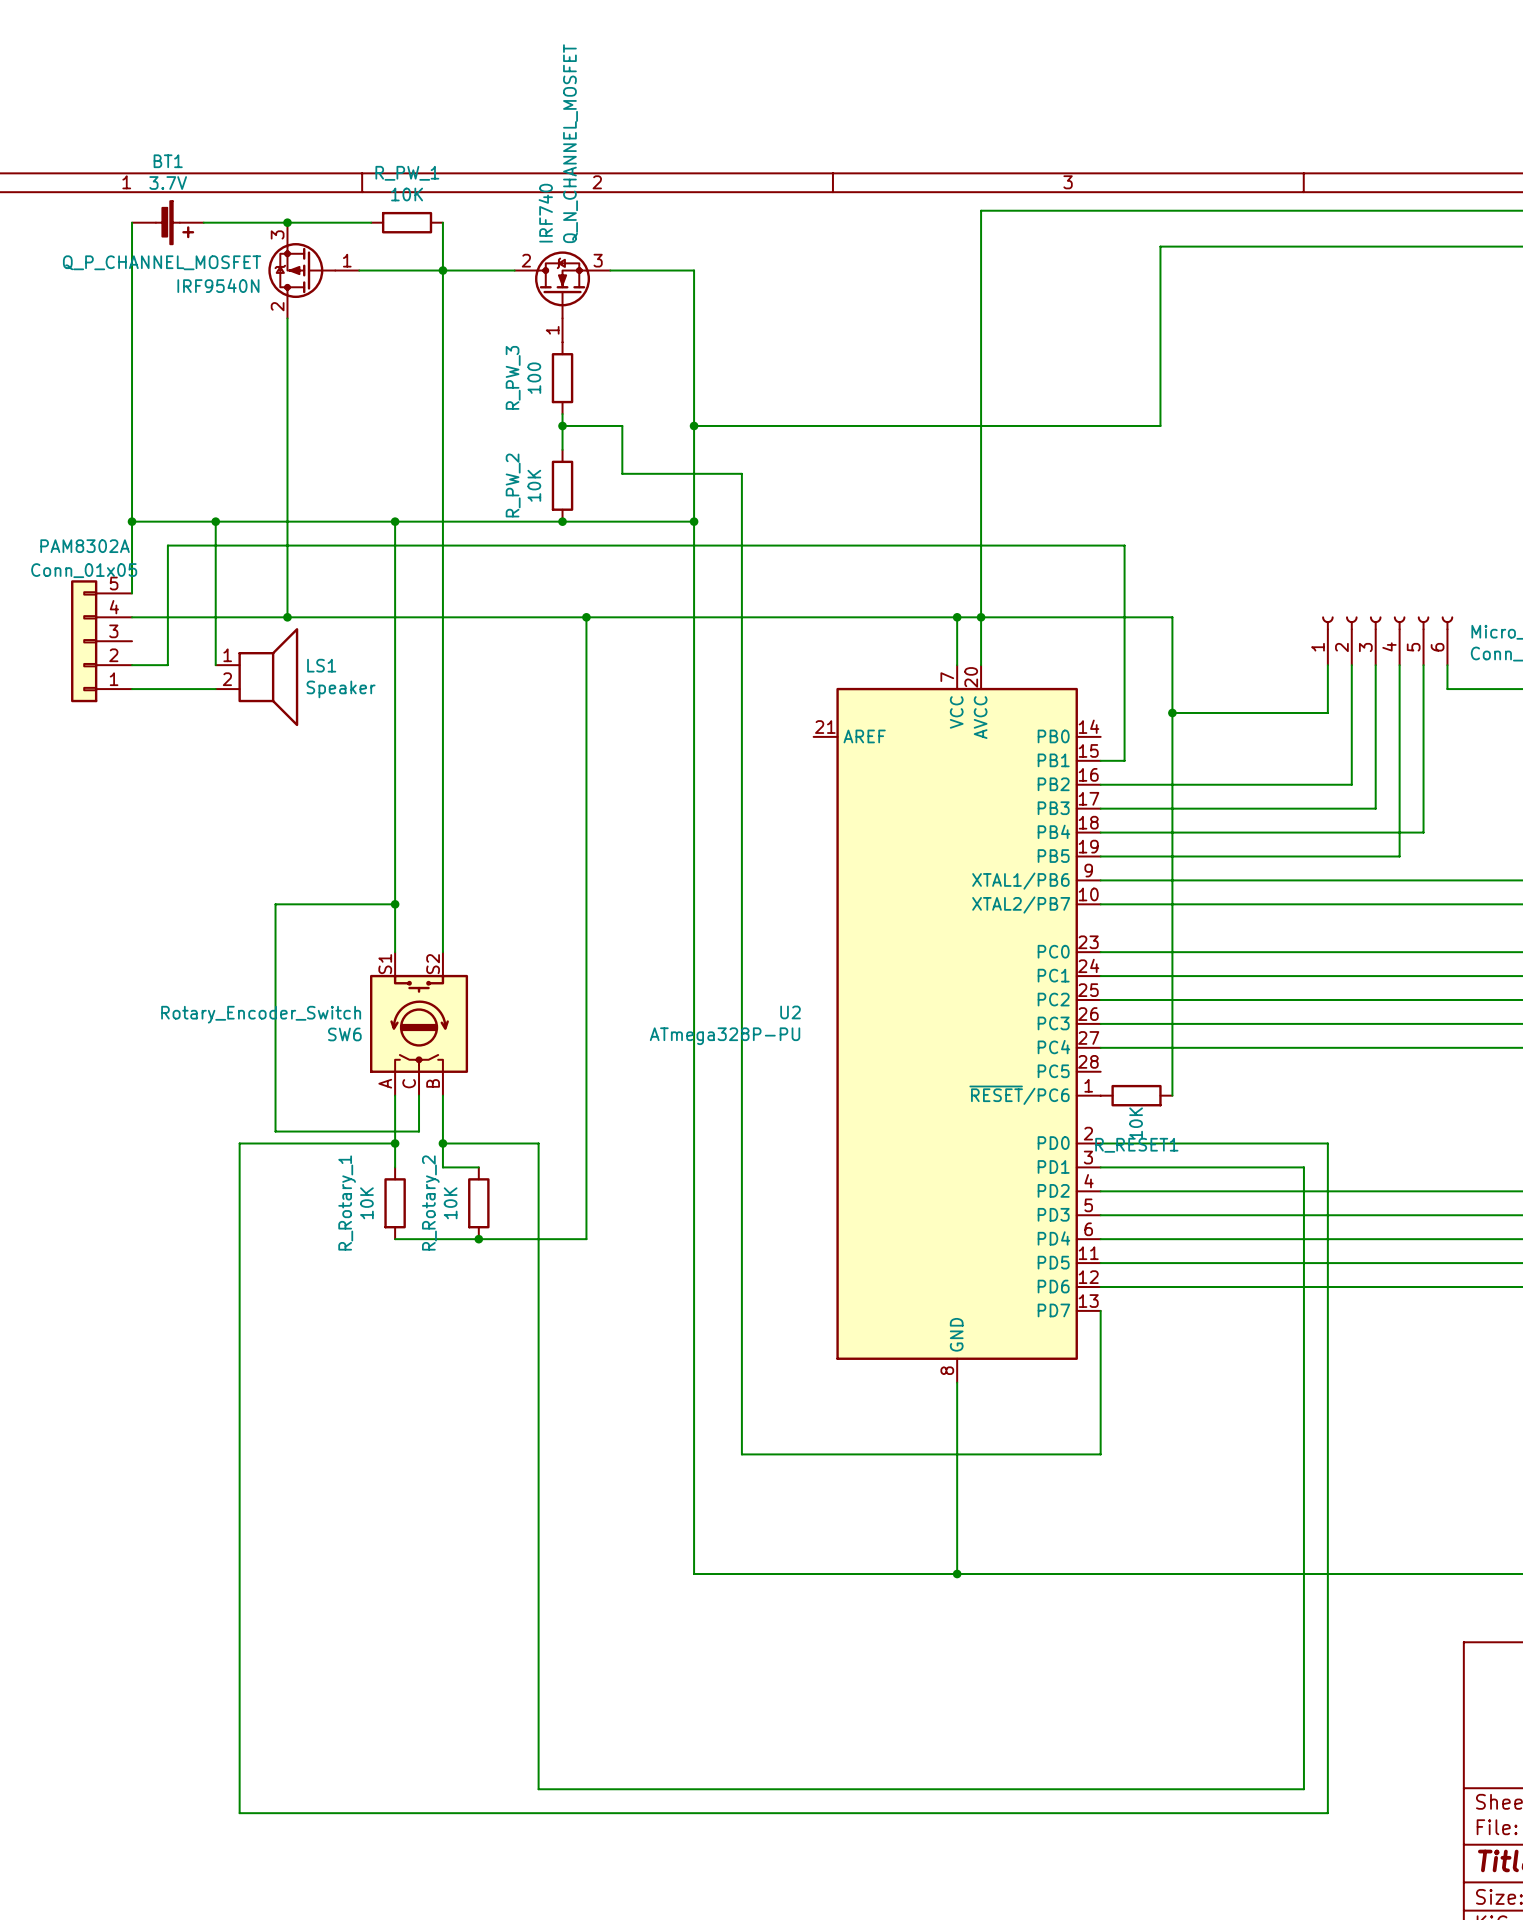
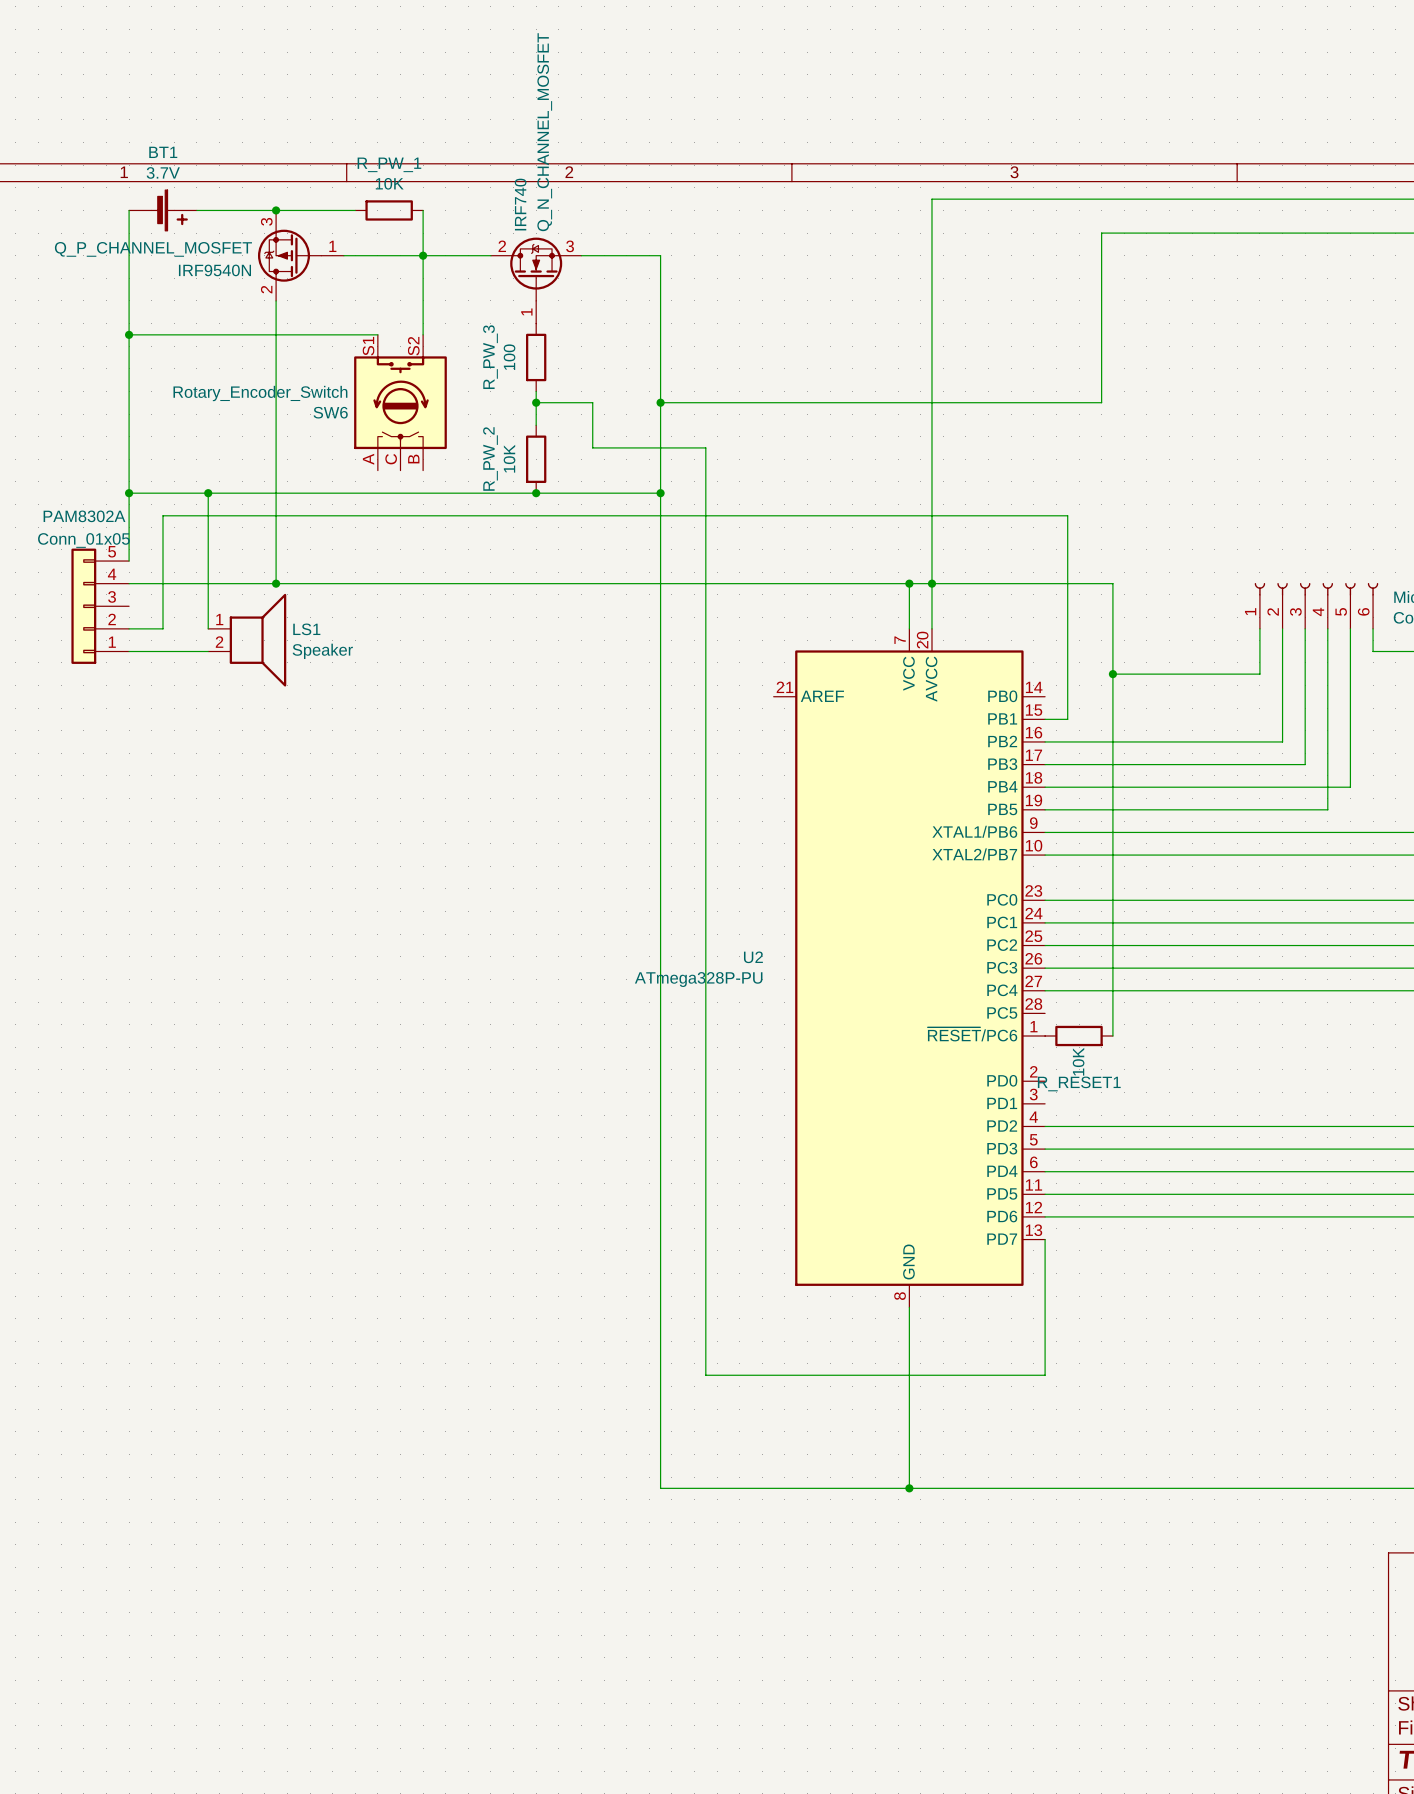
wire: none -> (129, 334) (377, 334)
junction: none -> (129, 334)
wire: (442, 354) (442, 952) -> none
wire: (395, 521) (395, 952) -> none
junction: (395, 521) -> none
wire: (586, 617) (586, 1239) (395, 1239) -> none
junction: (586, 617) -> none
wire: (395, 904) (275, 904) (275, 1131) (419, 1131) (419, 1095) -> none
junction: (395, 904) -> none
SW6 position: (419, 1023) -> (400, 402)
wire: (395, 1095) (395, 1167) -> none
wire: (442, 1095) (442, 1167) (478, 1167) -> none
wire: (395, 1143) (239, 1143) (239, 1813) (1327, 1813) (1327, 1143) (1100, 1143) -> none
junction: (395, 1143) -> none
wire: (442, 1143) (538, 1143) (538, 1789) (1303, 1789) (1303, 1167) (1100, 1167) -> none
junction: (442, 1143) -> none
R_Rotary_1: 10K (395, 1203) -> none
R_Rotary_2: 10K (478, 1203) -> none
junction: (478, 1239) -> none

